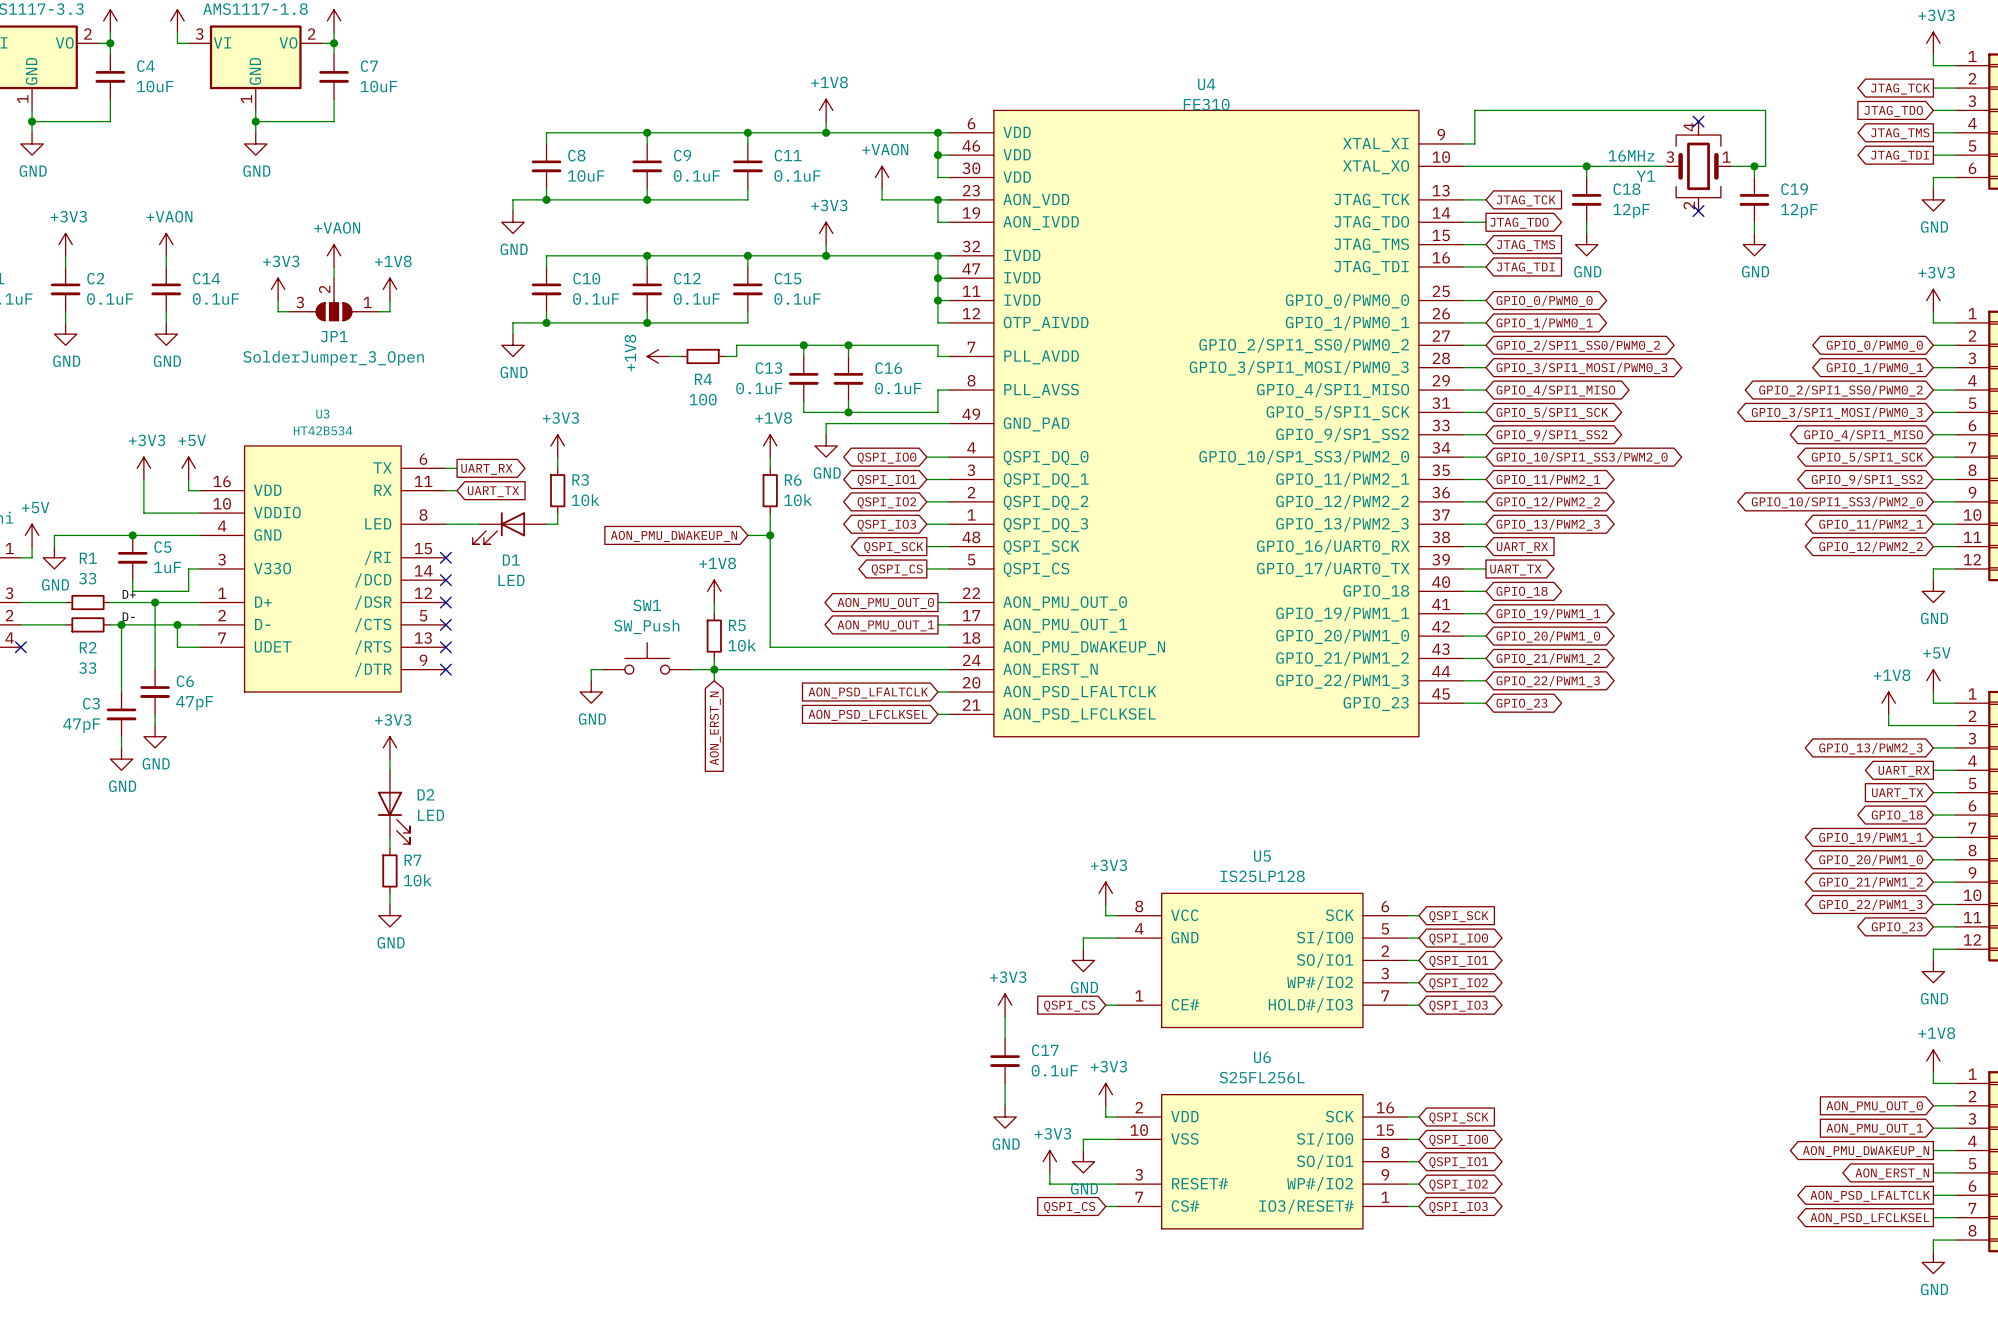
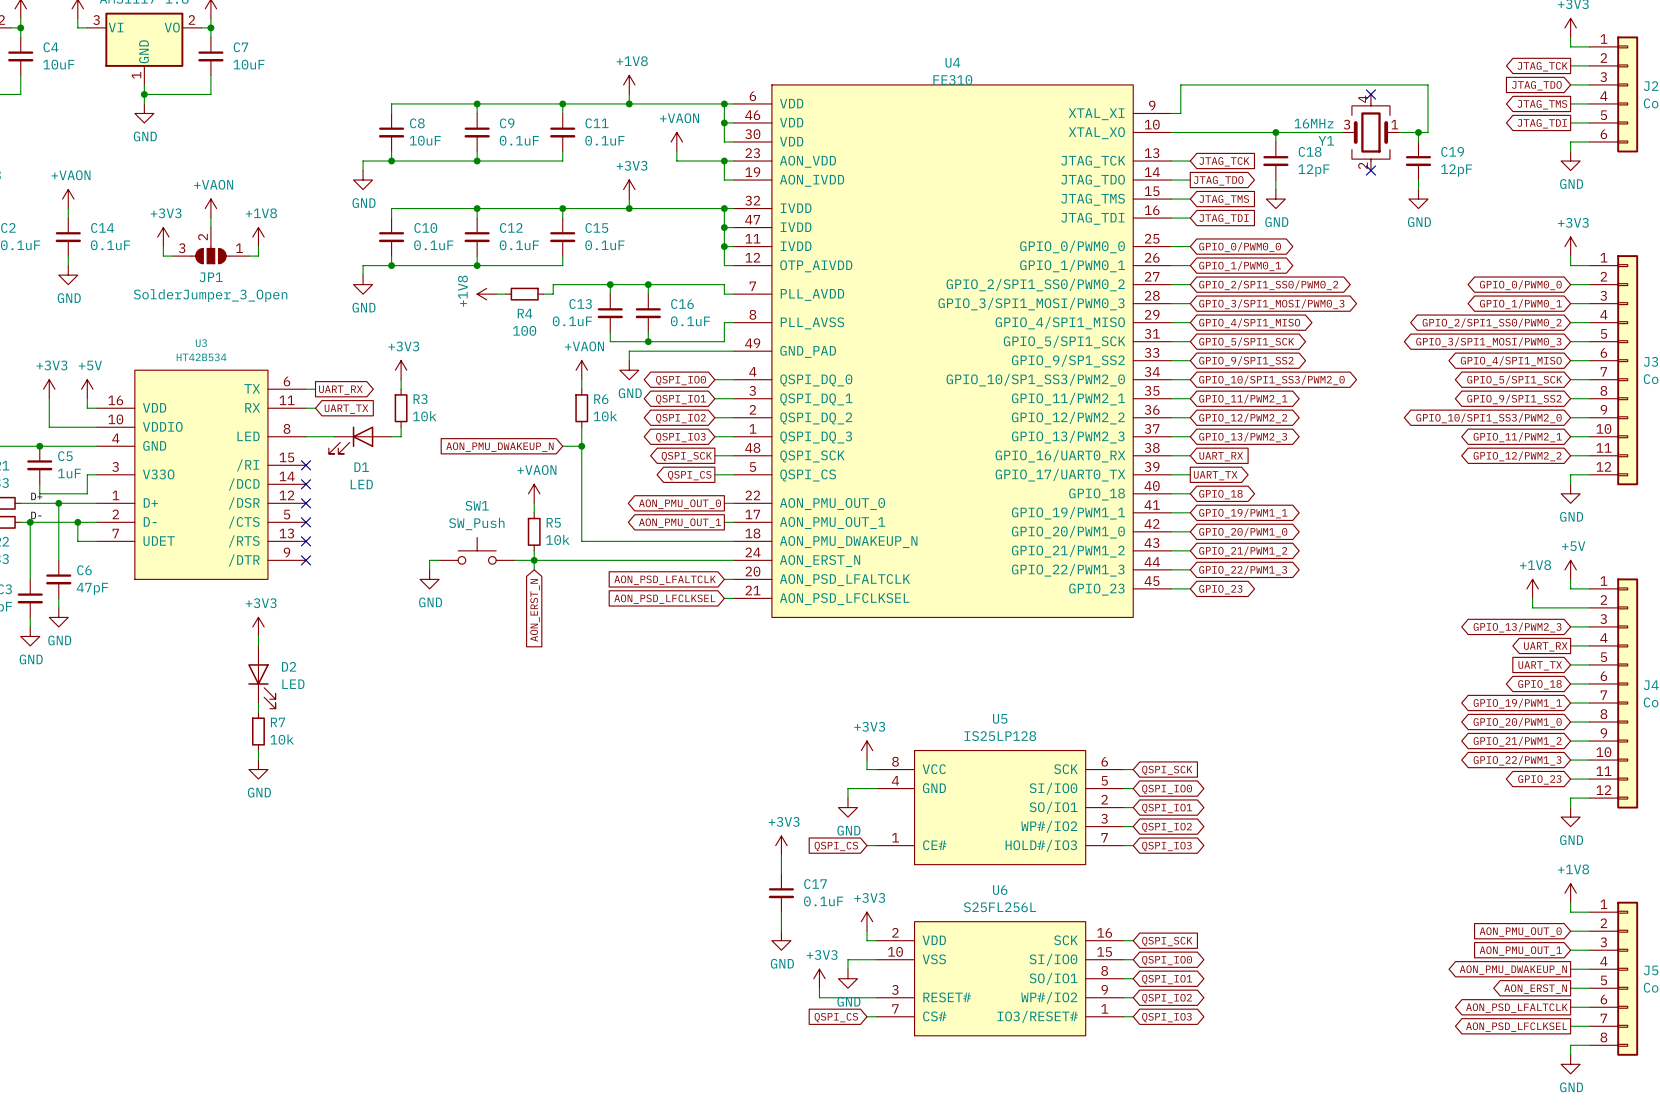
power symbol: +1V8 (770, 445) -> +VAON (581, 370)
power symbol: +1V8 (714, 591) -> +VAON (534, 493)

